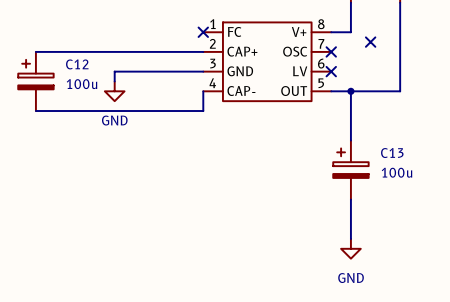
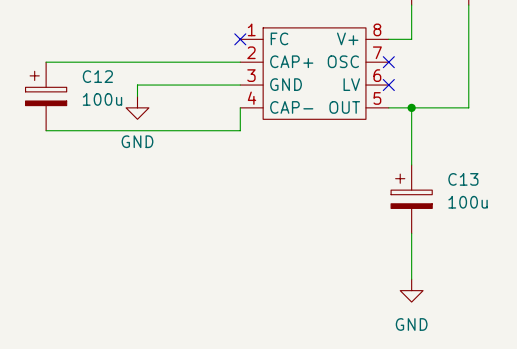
no-connect mark: (370, 42) -> none

